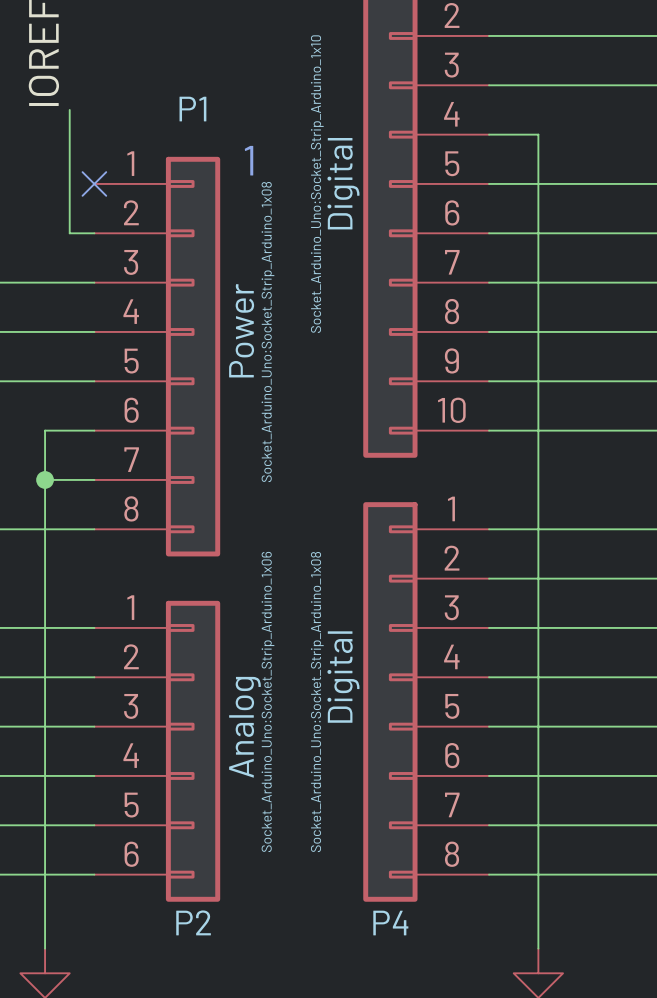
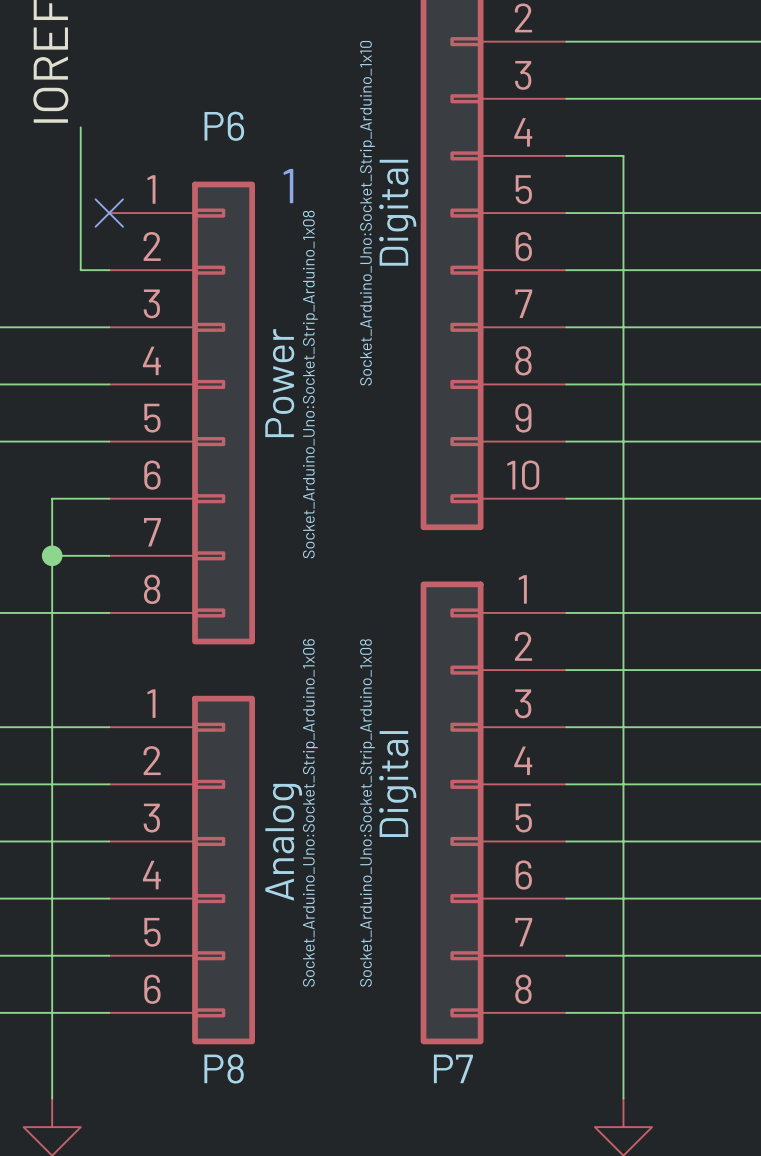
P1 name: P1 (192, 109) -> P6 (224, 126)
P2 name: P2 (193, 922) -> P8 (224, 1068)
P4 name: P4 (390, 923) -> P7 (453, 1068)

